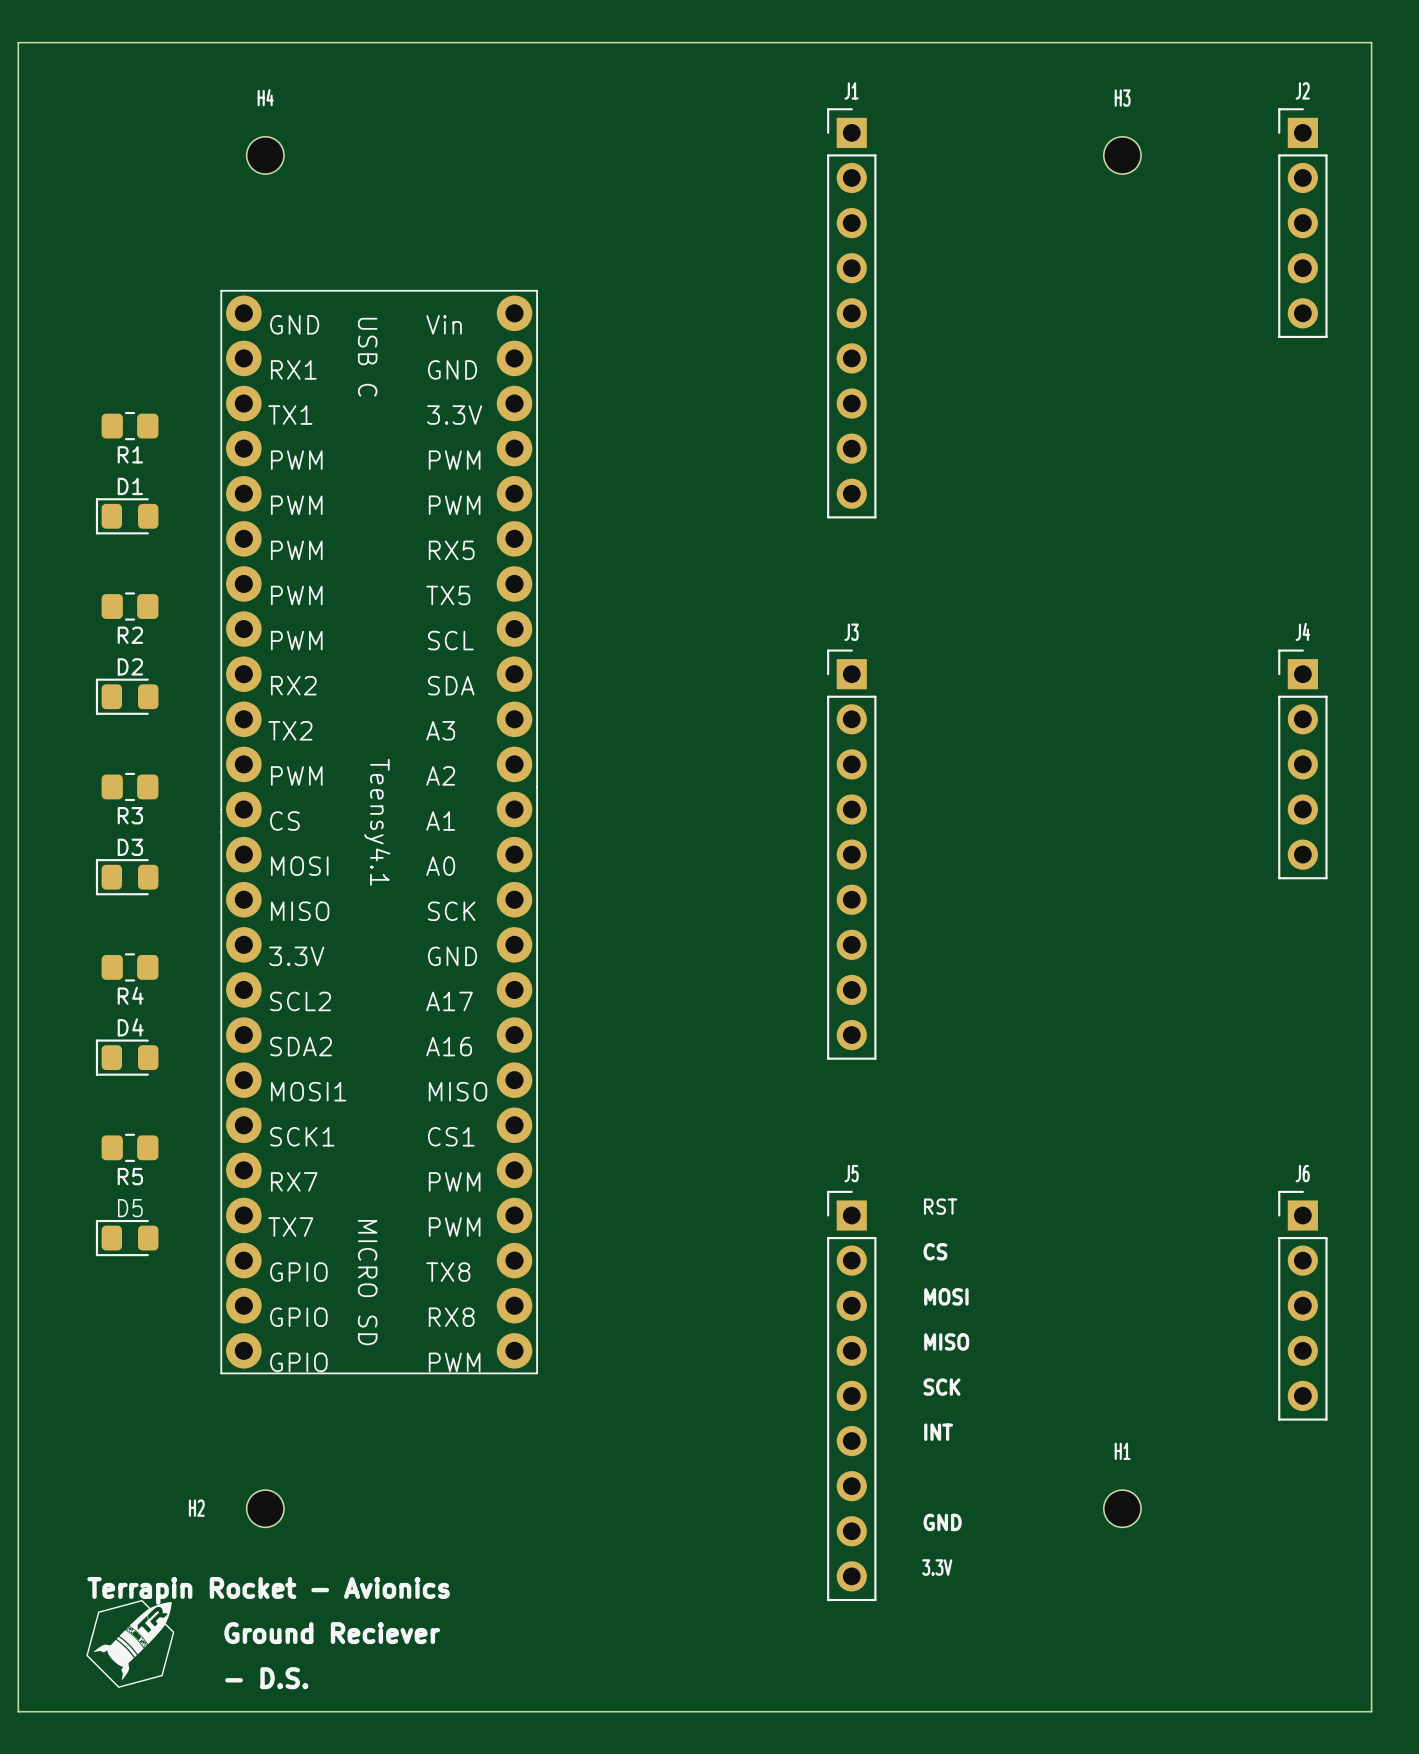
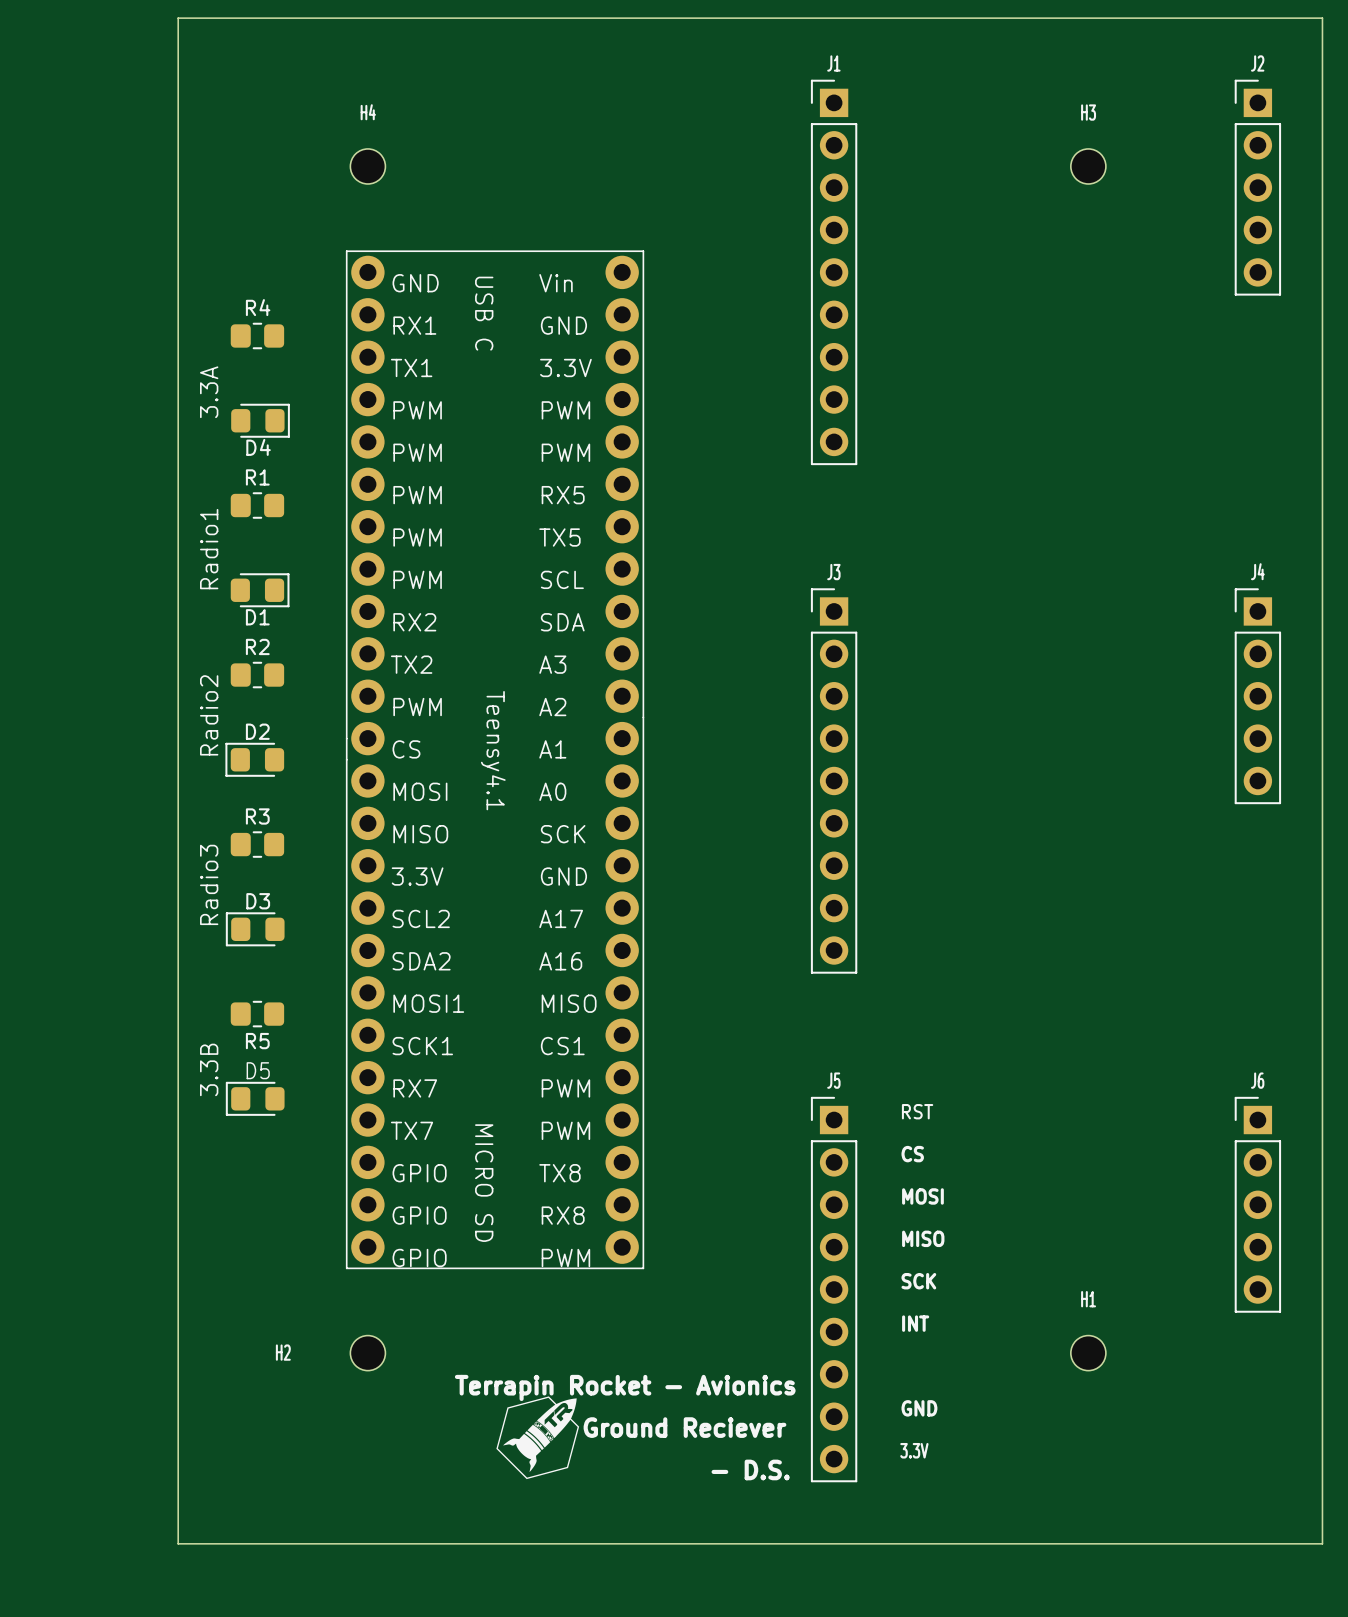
board edge: (153, 42) (18, 42) (18, 1711) (1371, 1711) (1371, 1666) -> (178, 18) (178, 1543) (1322, 1543)
H4 position: (265, 155) -> (367, 166)
H3 position: (1122, 155) -> (1088, 166)
R1 position: (130, 426) -> (257, 505)
text: none -> 3.3A (209, 392)
R1 name position: R1 (130, 454) -> R1 (257, 477)
D1 rotation: 0° (127, 516) -> 180° (260, 590)
D1 position: (127, 516) -> (260, 590)
R2 position: (130, 606) -> (257, 675)
text: none -> Radio1 (209, 549)
R2 name position: R2 (130, 635) -> R2 (257, 646)
D2 position: (127, 696) -> (254, 759)
text: none -> Radio2 (209, 715)
R3 position: (130, 786) -> (257, 844)
R3 name position: R3 (130, 815) -> R3 (257, 816)
Teensy4.1 position: (379, 832) -> (495, 759)
D3 position: (127, 877) -> (255, 929)
text: none -> Radio3 (209, 884)
R4 position: (130, 967) -> (257, 335)
R4 name position: R4 (130, 995) -> R4 (258, 307)
D4 rotation: 0° (127, 1057) -> 180° (260, 420)
D4 position: (127, 1057) -> (260, 420)
R5 position: (130, 1147) -> (257, 1014)
text: none -> 3.3B (209, 1069)
D5 position: (127, 1238) -> (255, 1098)
H2 name position: H2 (196, 1508) -> H2 (283, 1352)
H2 position: (265, 1508) -> (367, 1353)
H1 position: (1122, 1508) -> (1088, 1353)
text: none -> - D.S. (750, 1469)
text position: Terrapin Rocket - Avionics (268, 1590) -> Terrapin Rocket - Avionics (625, 1387)
text position: Ground Reciever (332, 1633) -> Ground Reciever (684, 1427)
drawing position: (130, 1643) -> (537, 1437)
text: - D.S. (266, 1678) -> none

